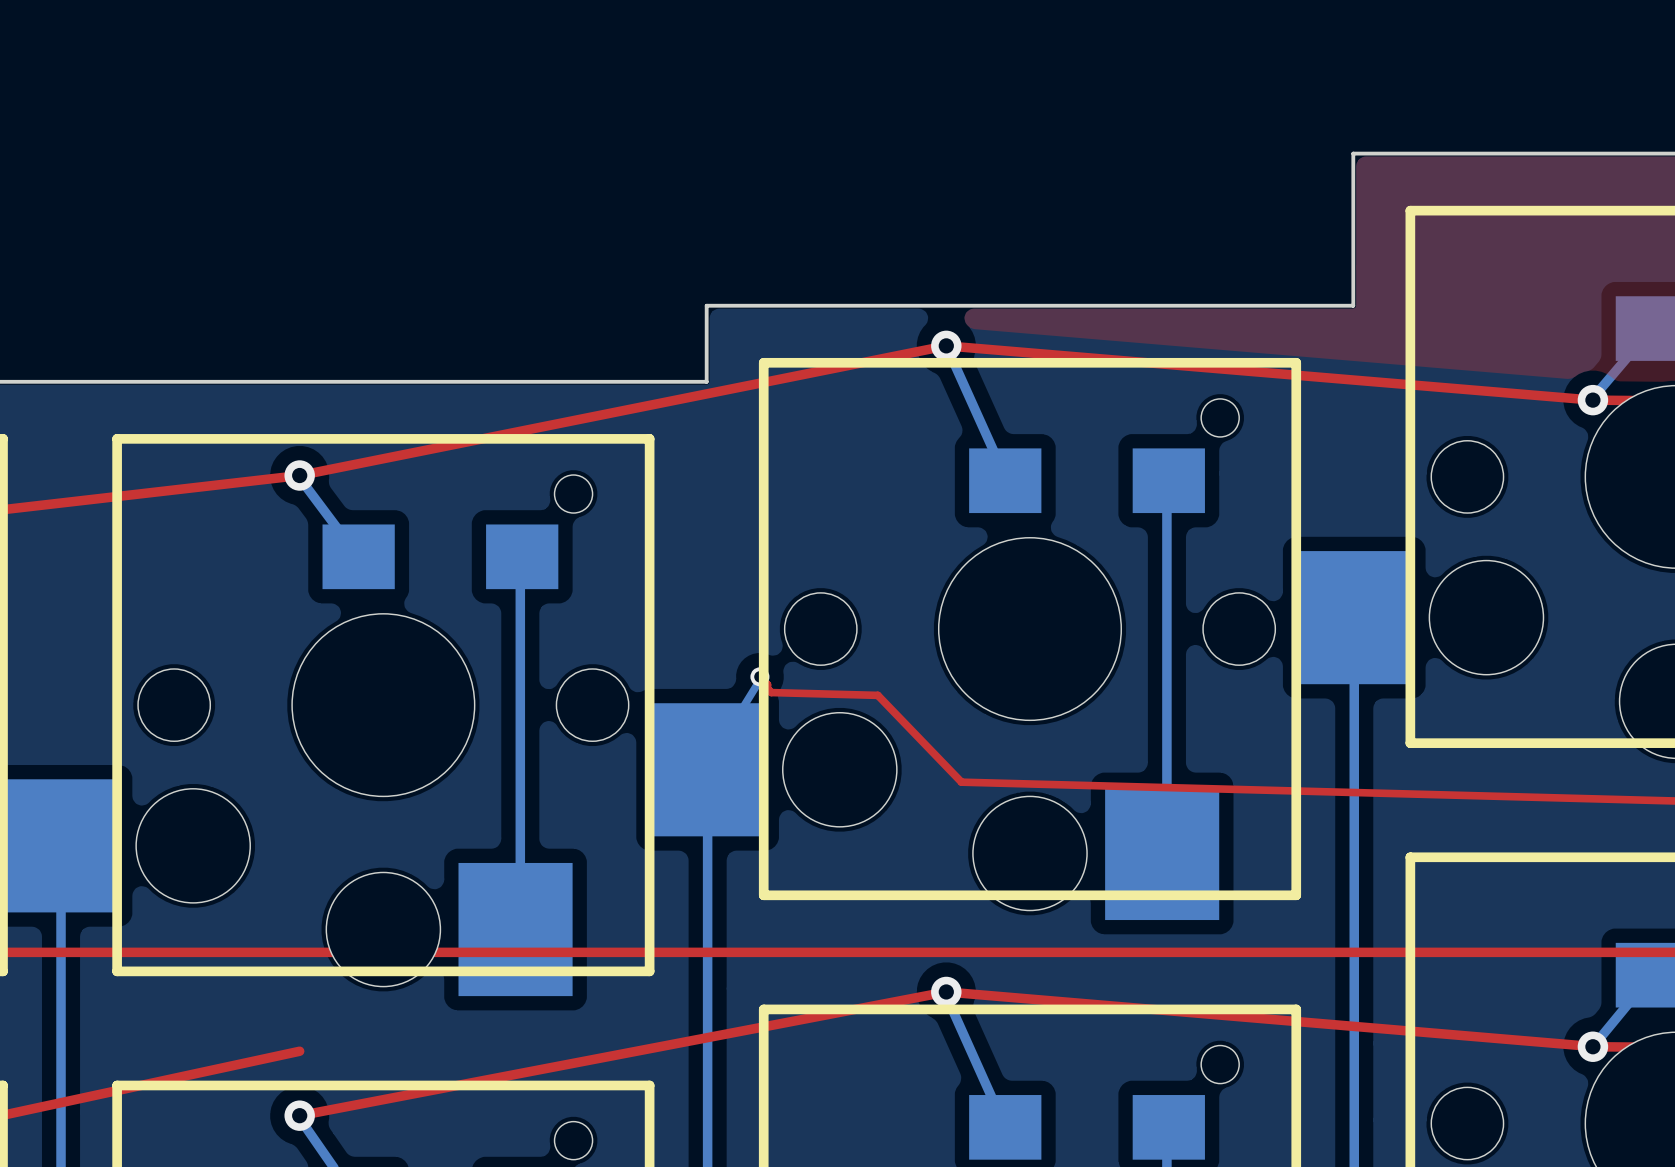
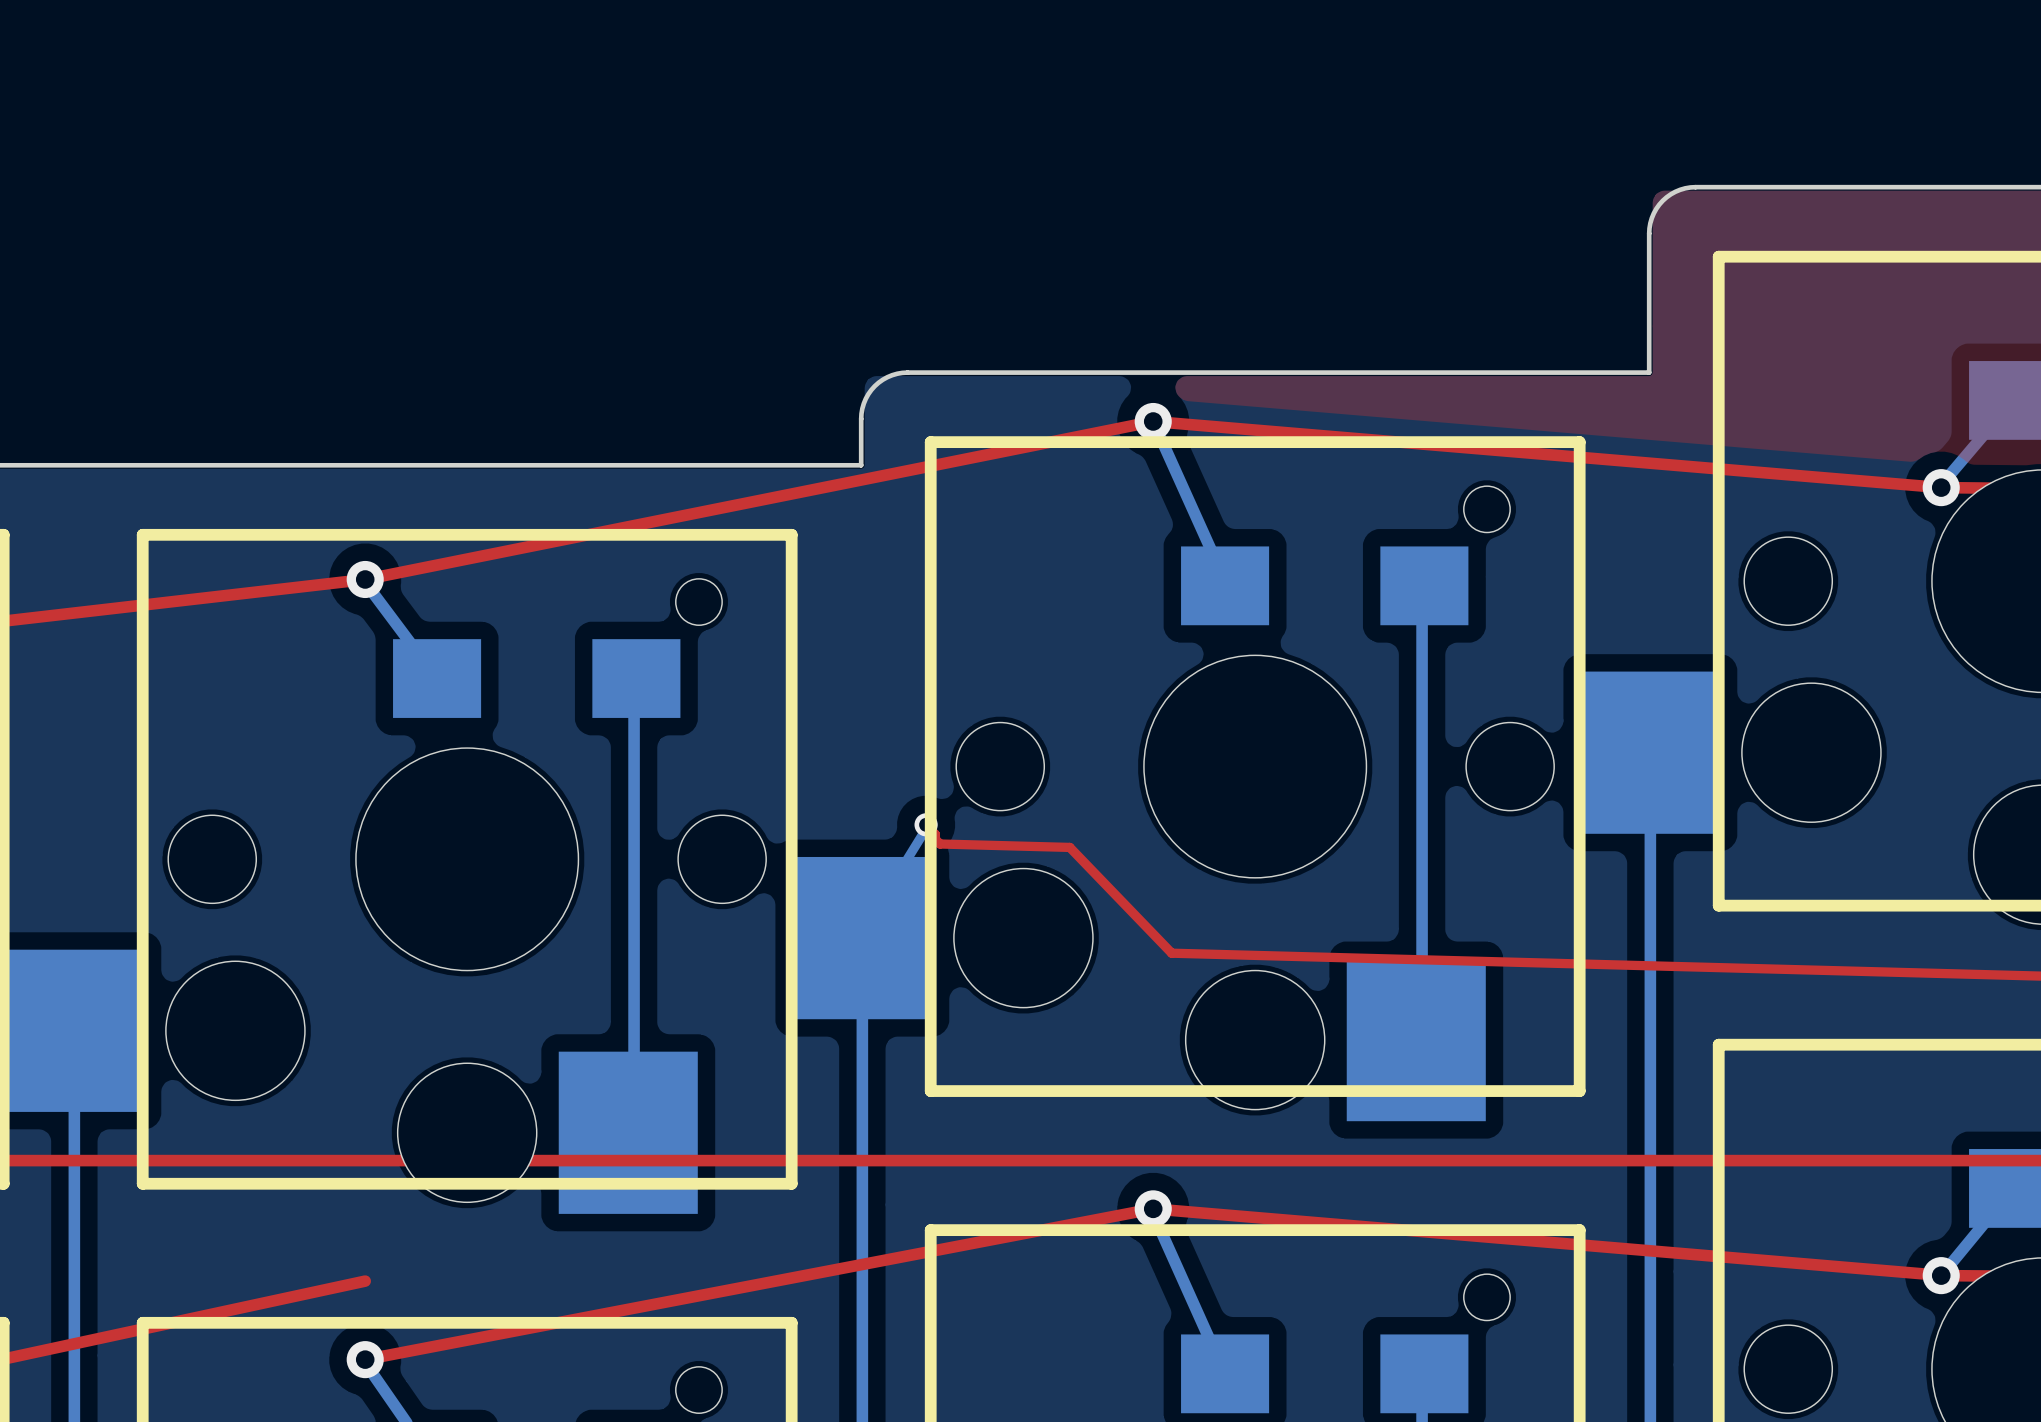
board edge: (1391, 153) (1353, 153) (1353, 191) -> (1695, 187) (1675, 191) (1662, 200) (1653, 213) (1649, 233)
board edge: (744, 305) (706, 305) (706, 343) -> (907, 372) (887, 377) (874, 386) (865, 398) (861, 418)

